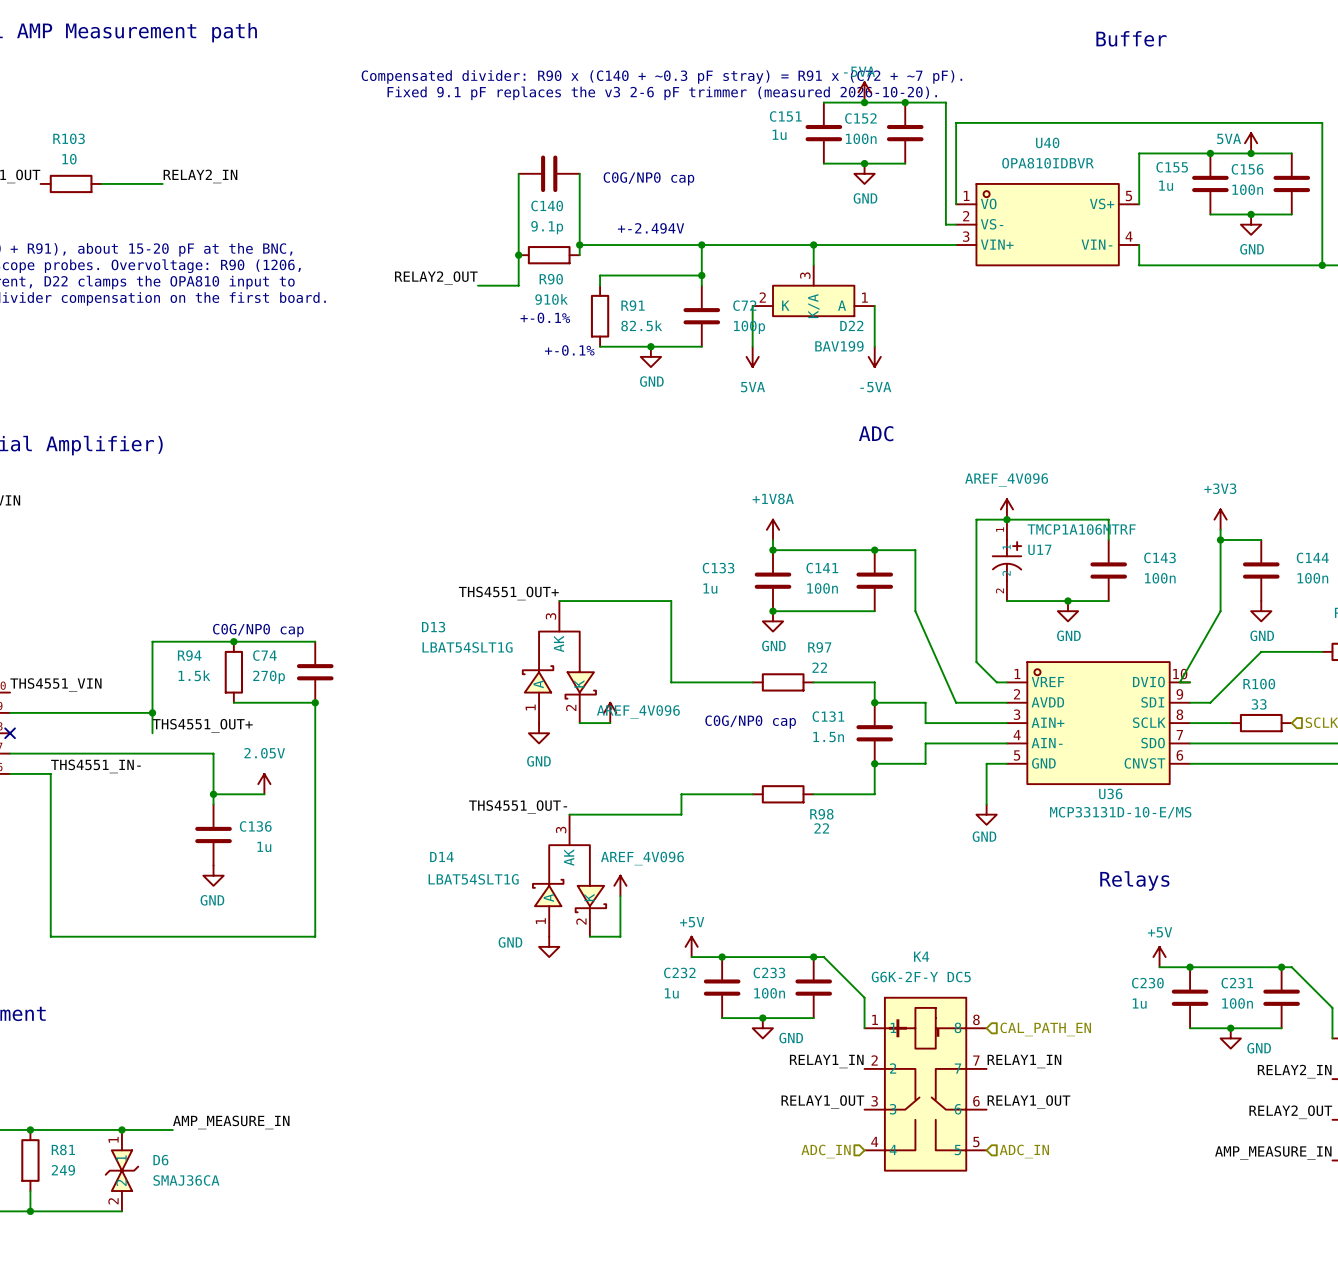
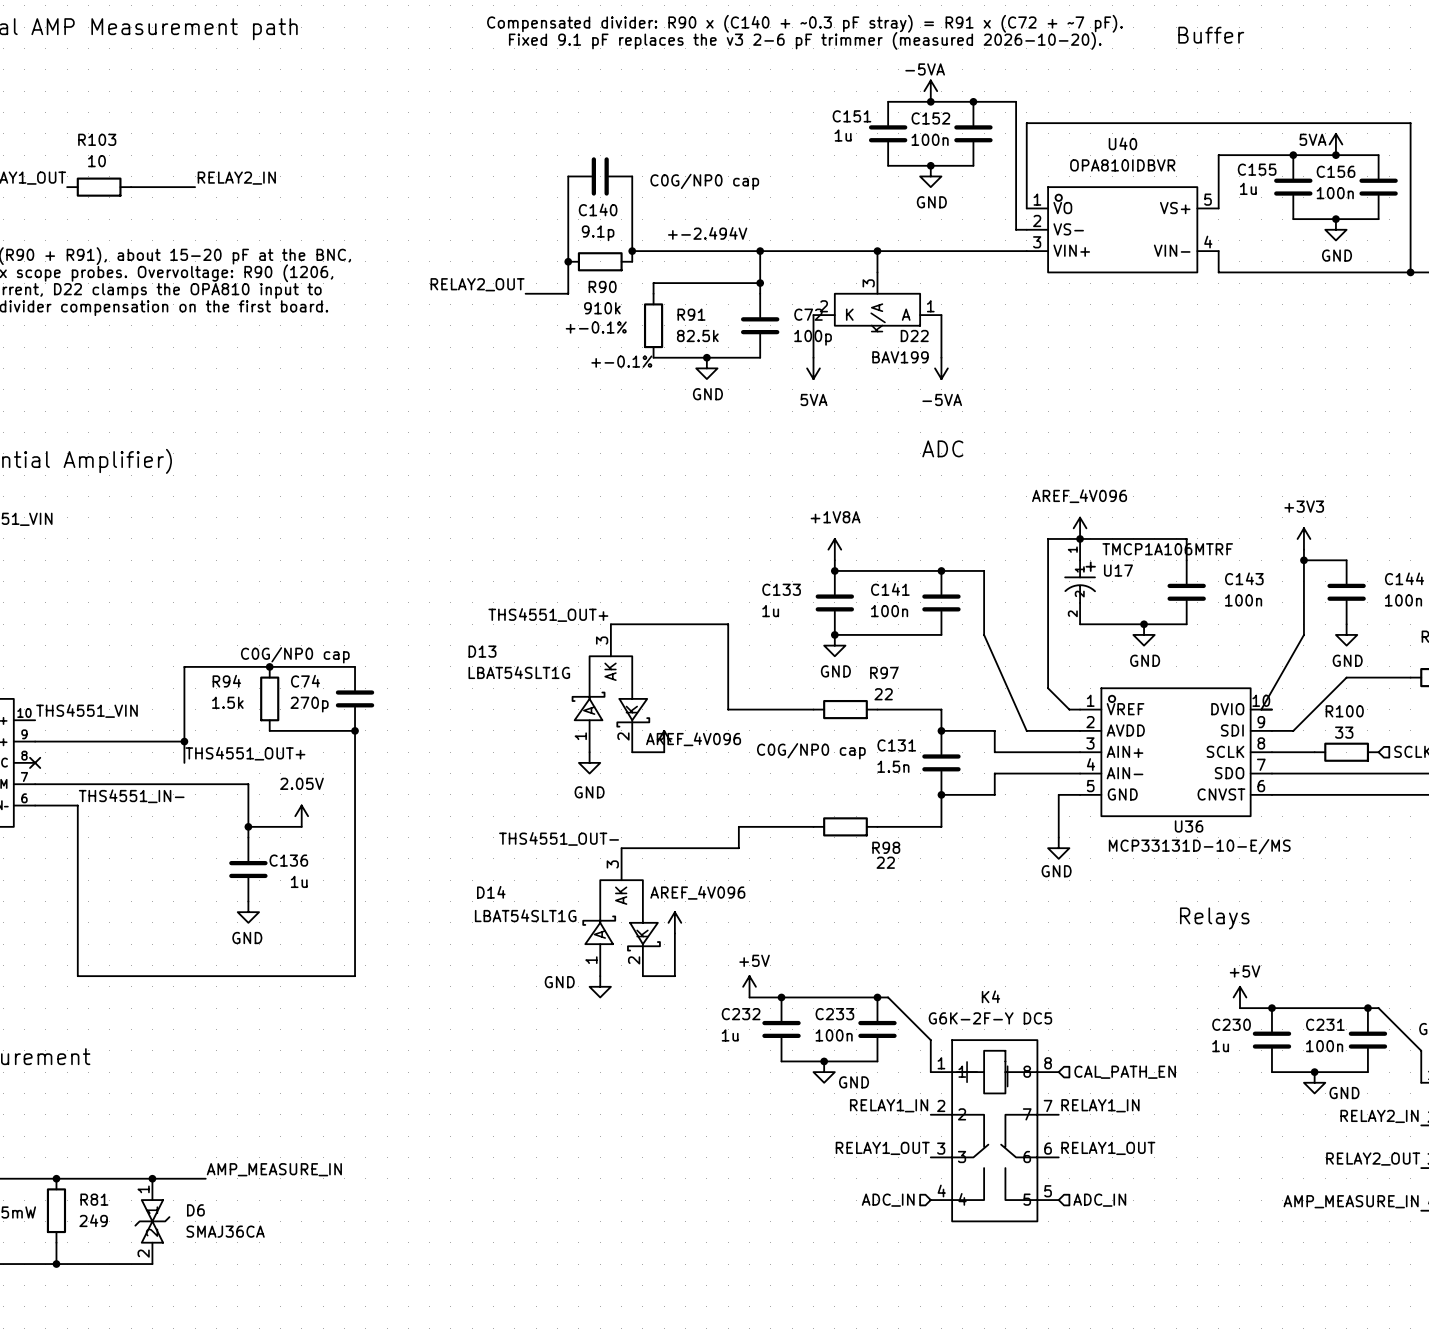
text position: Compensated divider: R90 x (C140 + ~0.3 pF stray) = R91 x (C72 + ~7 pF). (661, 76) -> Compensated divider: R90 x (C140 + ~0.3 pF stray) = R91 x (C72 + ~7 pF). (804, 23)
text position: Fixed 9.1 pF replaces the v3 2-6 pF trimmer (measured 2026-10-20). (662, 93) -> Fixed 9.1 pF replaces the v3 2-6 pF trimmer (measured 2026-10-20). (805, 40)

